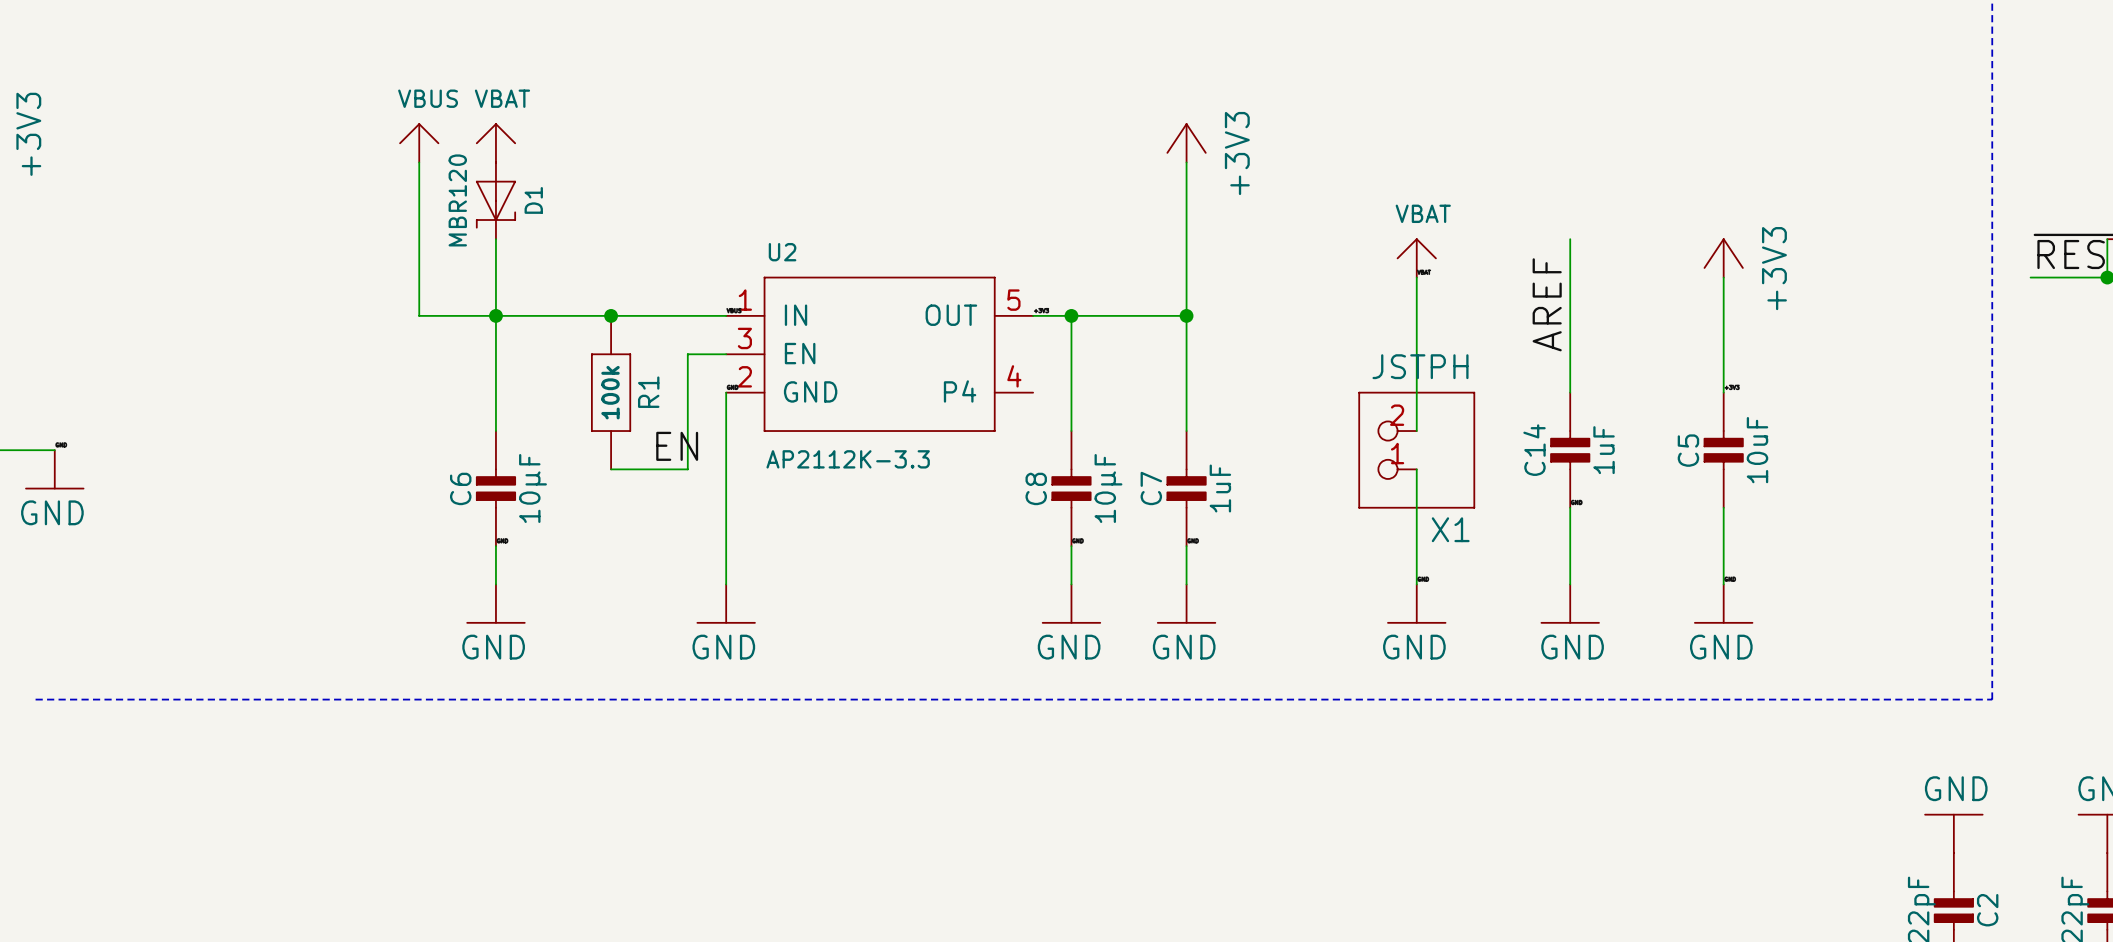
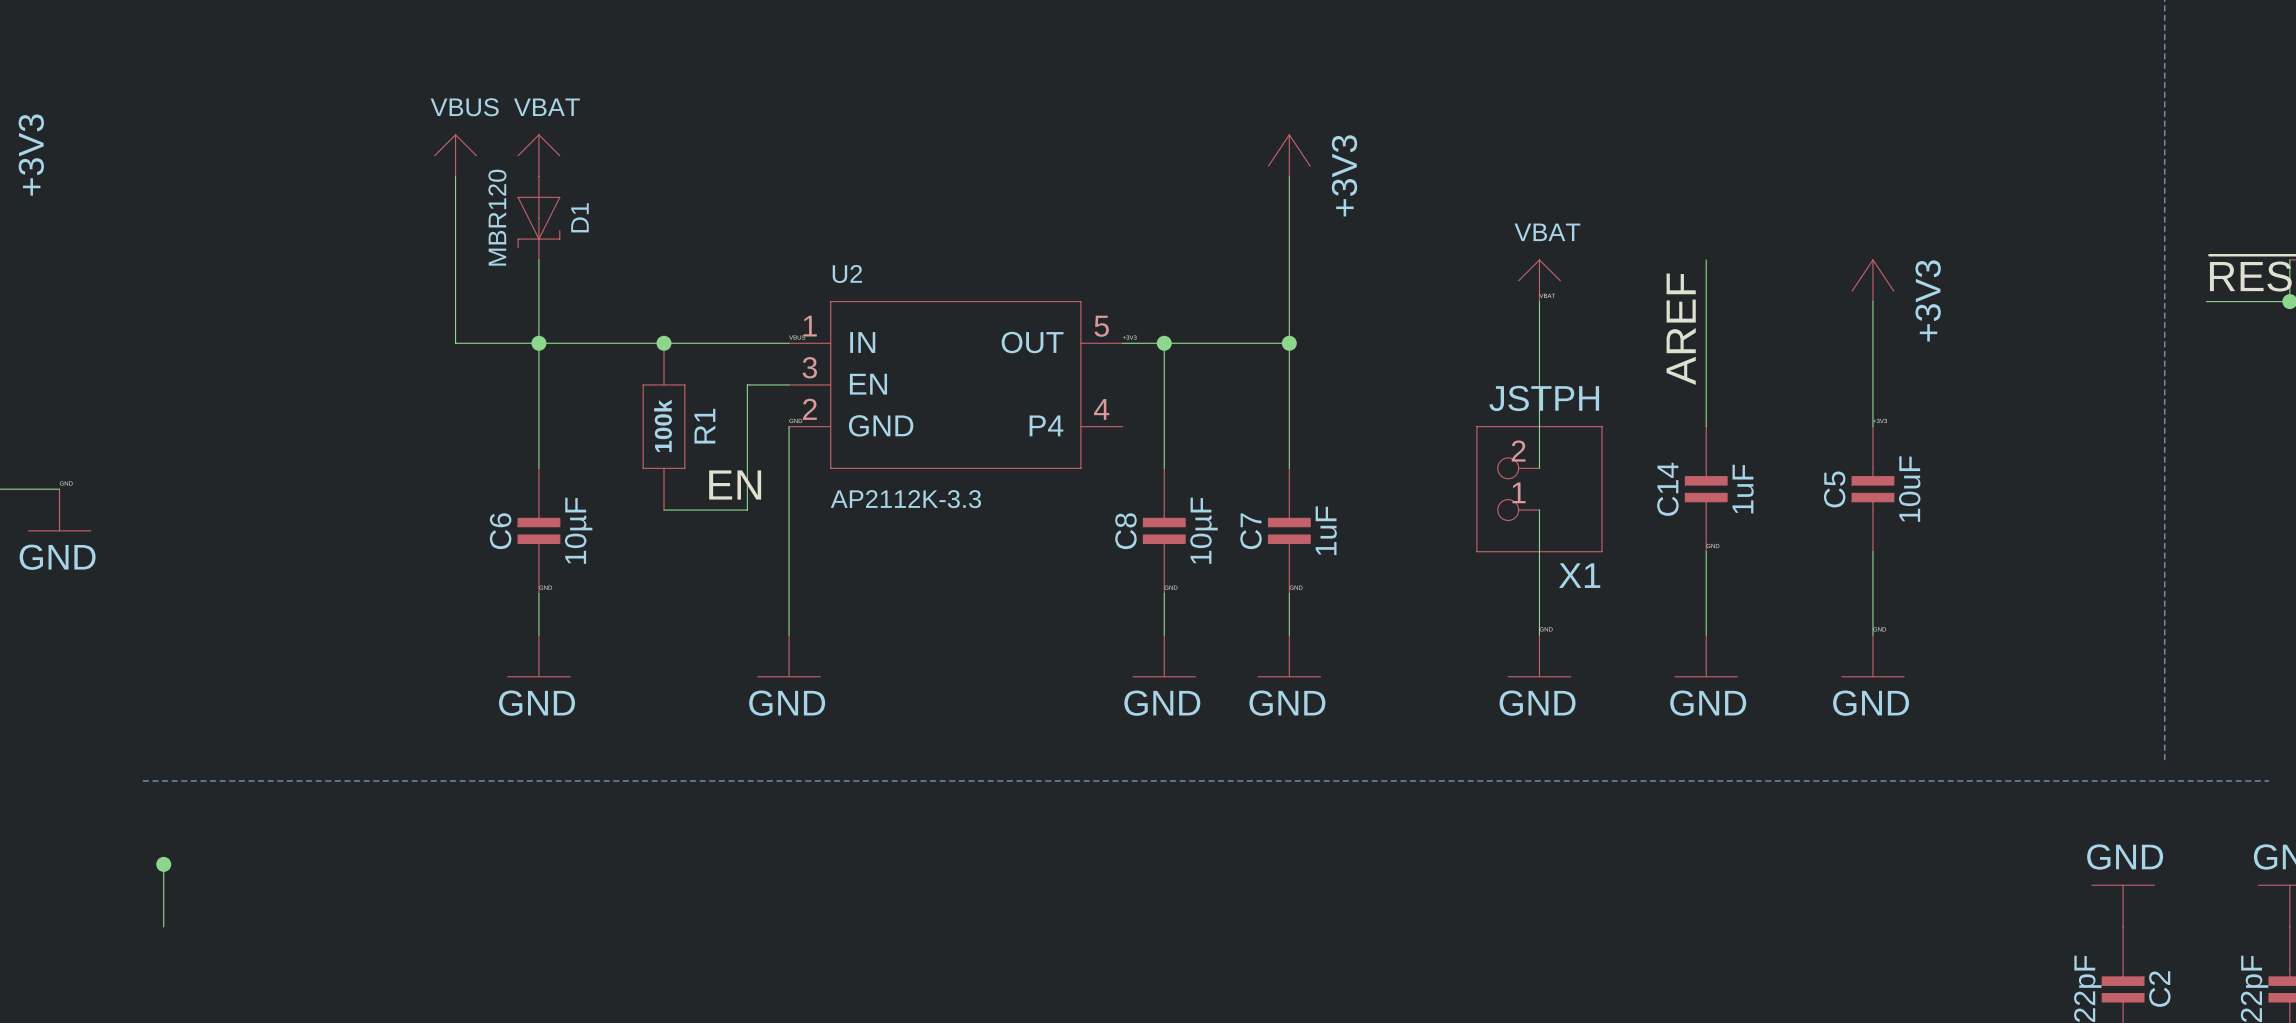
line: (35, 699) (1992, 699) -> (142, 781) (2269, 781)
wire: none -> (163, 864) (163, 926)
junction: none -> (163, 864)

